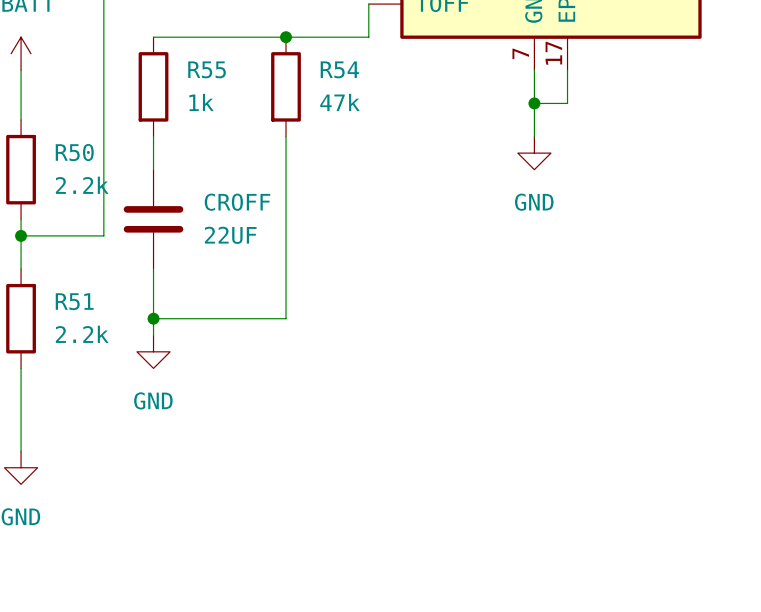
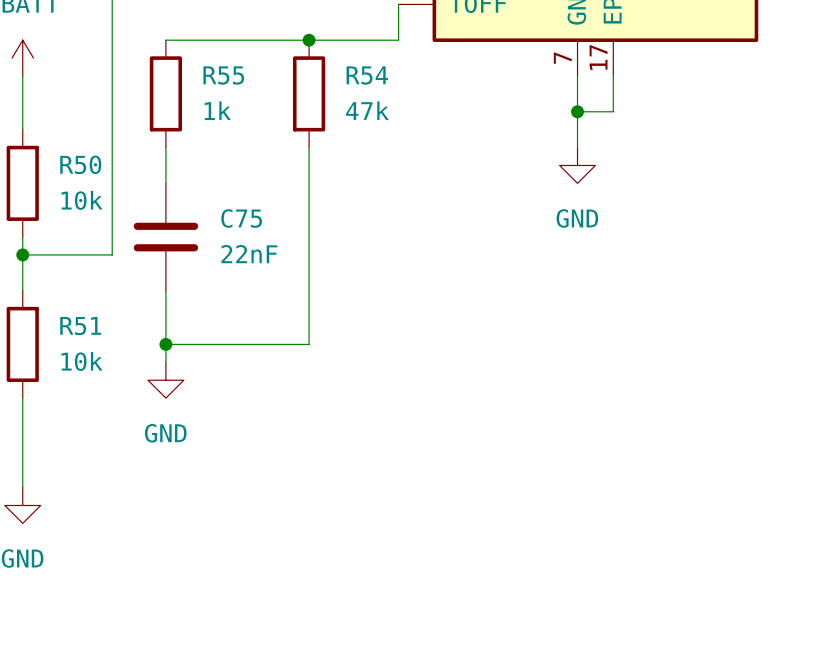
R50 value: 2.2k (82, 185) -> 10k (81, 200)
CROFF name: CROFF (237, 202) -> C75 (241, 218)
CROFF value: 22UF (230, 235) -> 22nF (249, 254)
R51 value: 2.2k (82, 334) -> 10k (81, 361)

